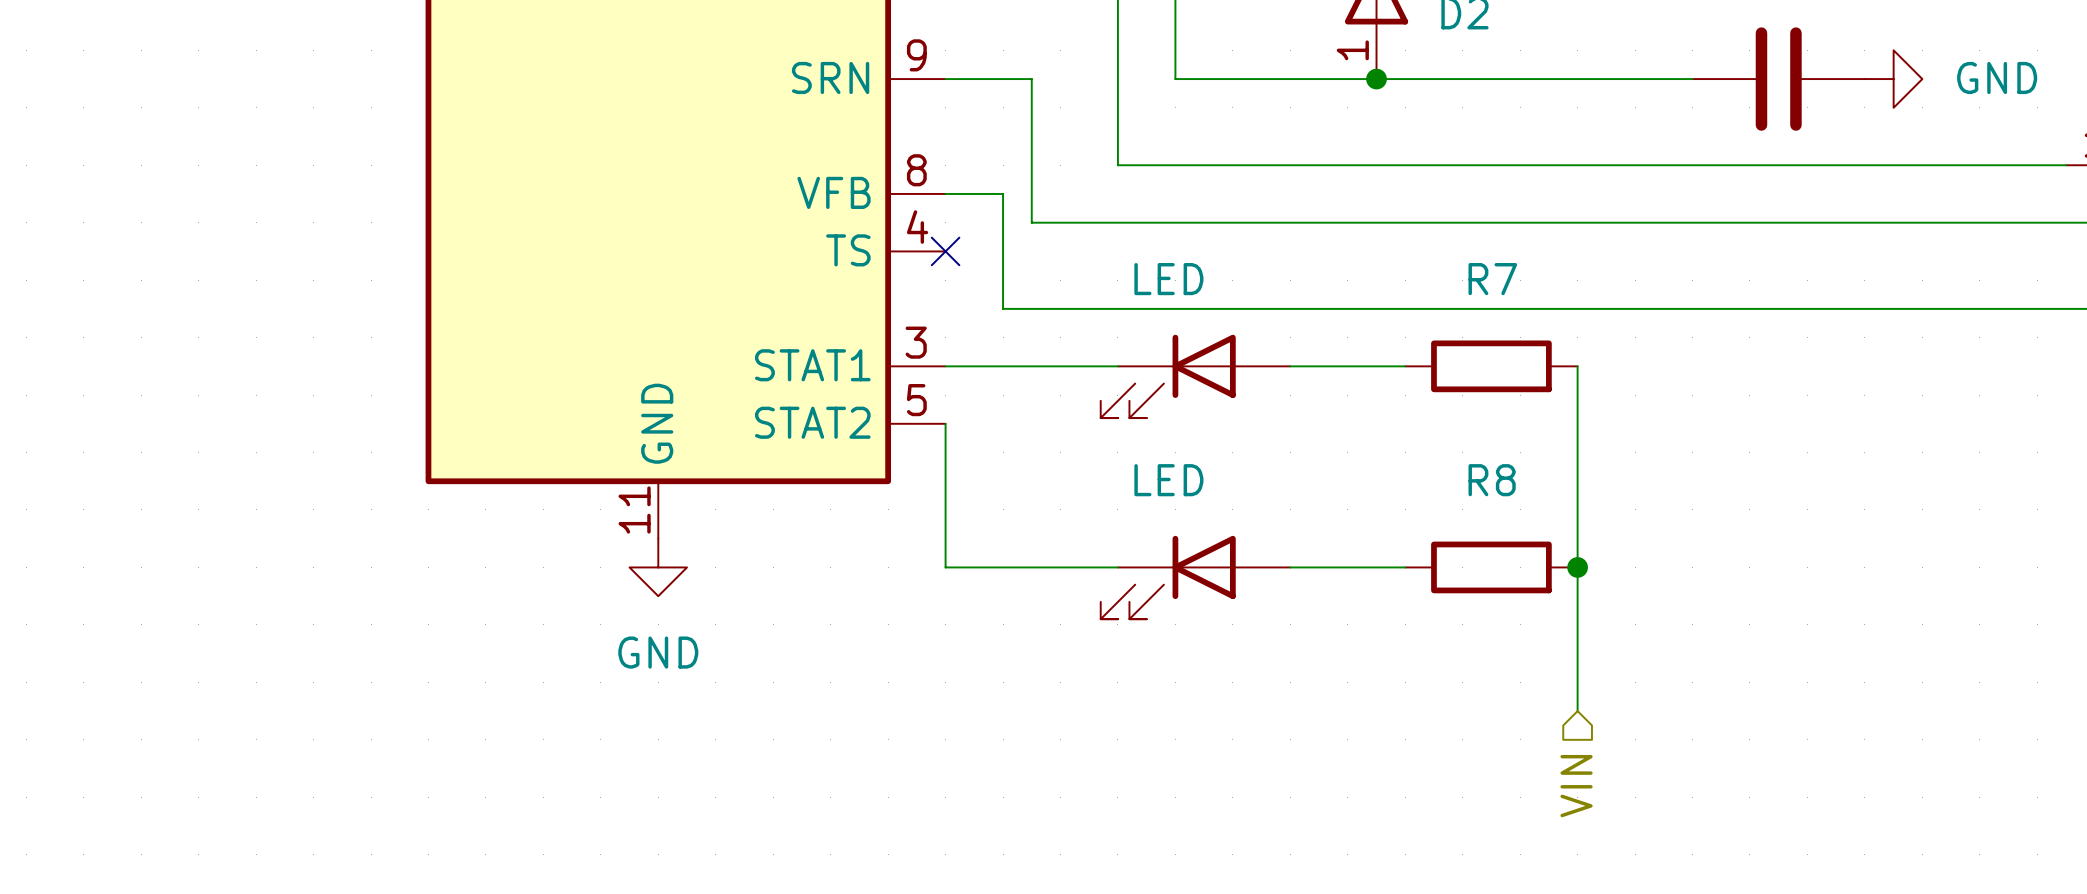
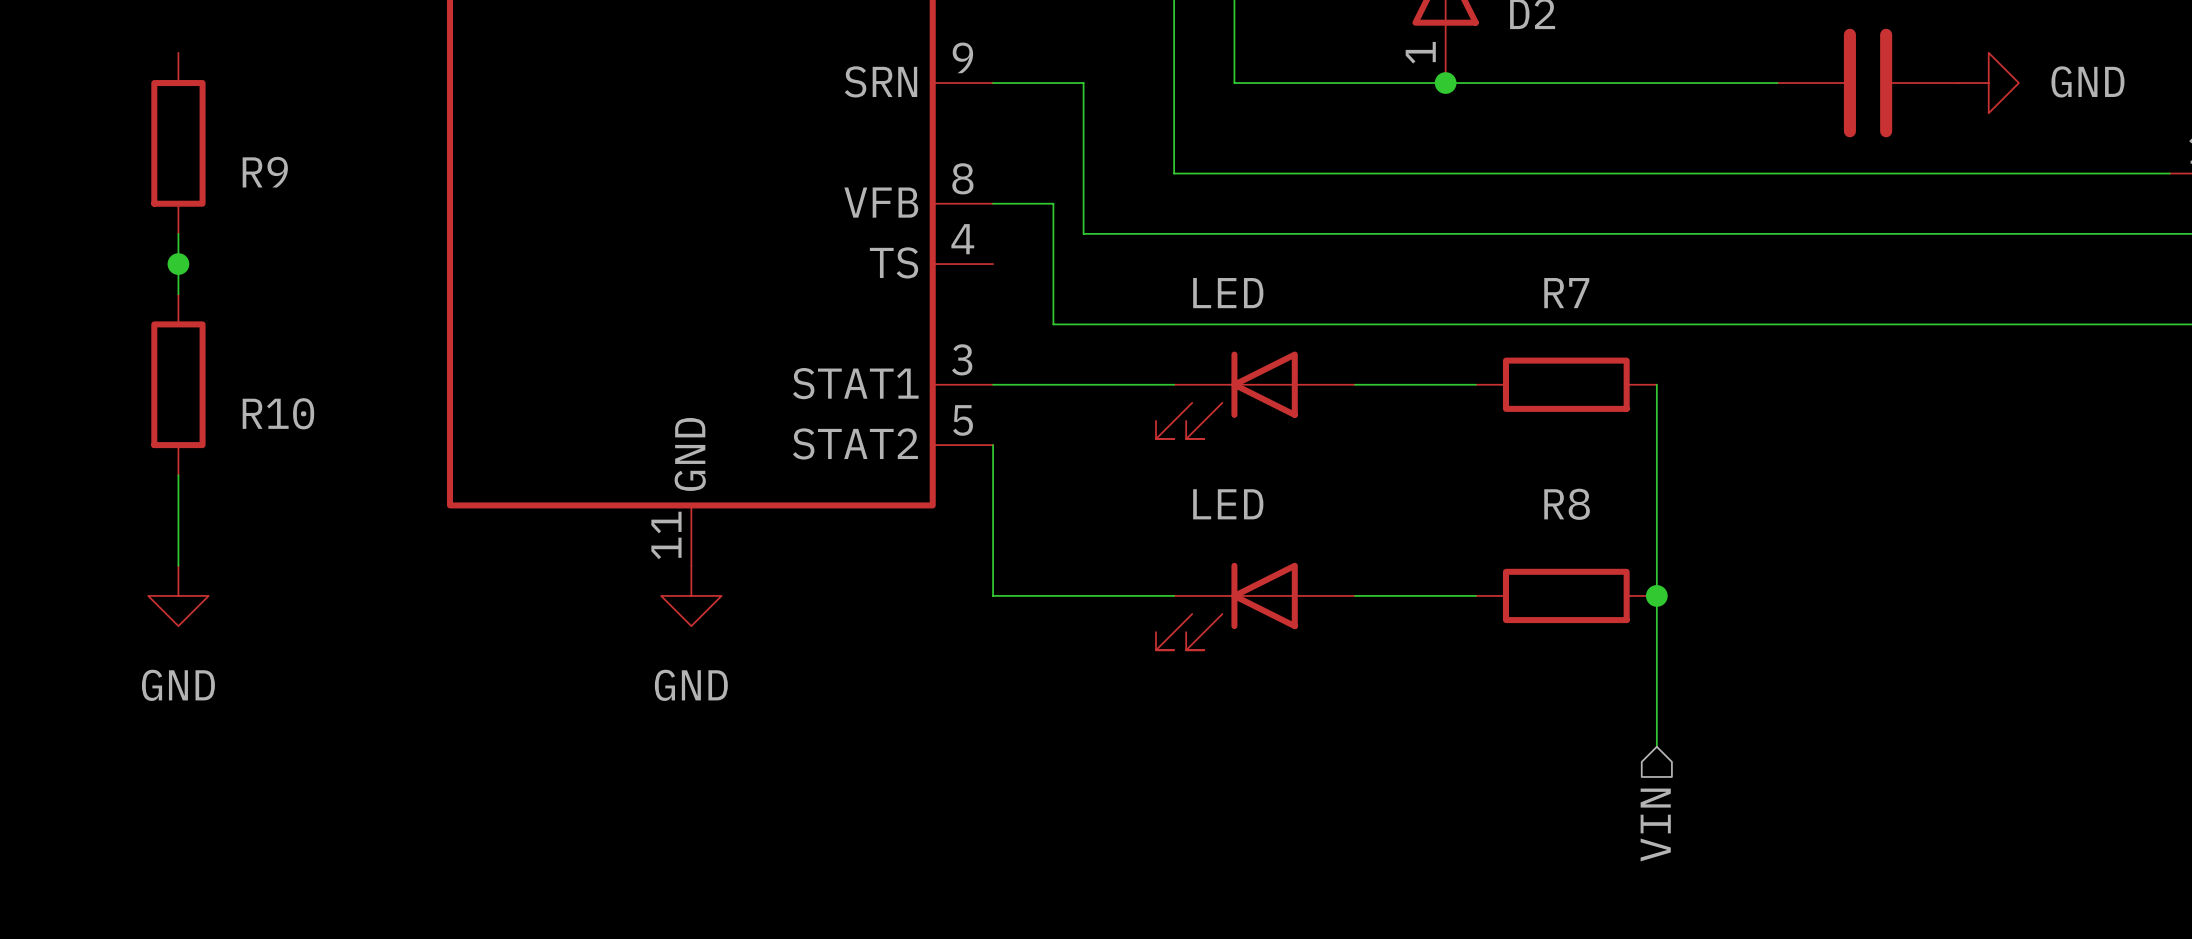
part: none -> R9 (178, 143)
wire: none -> (178, 233) (178, 294)
junction: none -> (178, 264)
no-connect mark: (945, 251) -> none
part: none -> R10 (178, 384)
wire: none -> (178, 475) (178, 565)
power symbol: none -> GND (178, 595)

